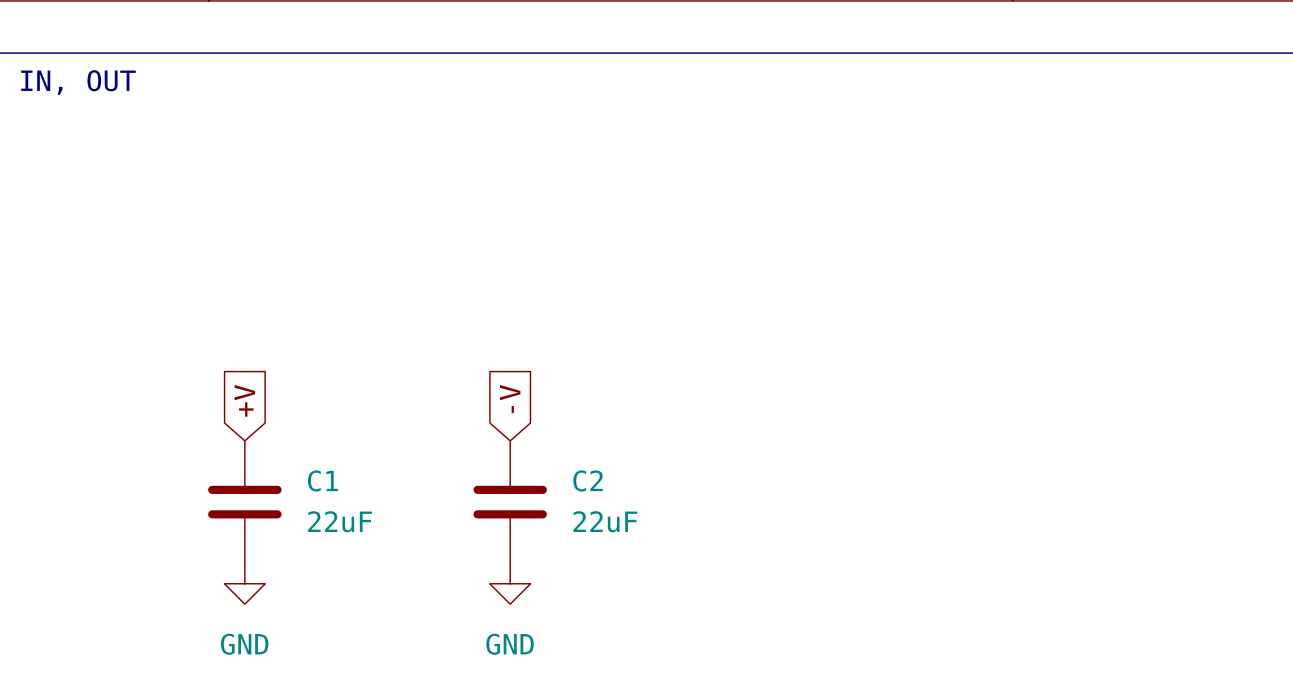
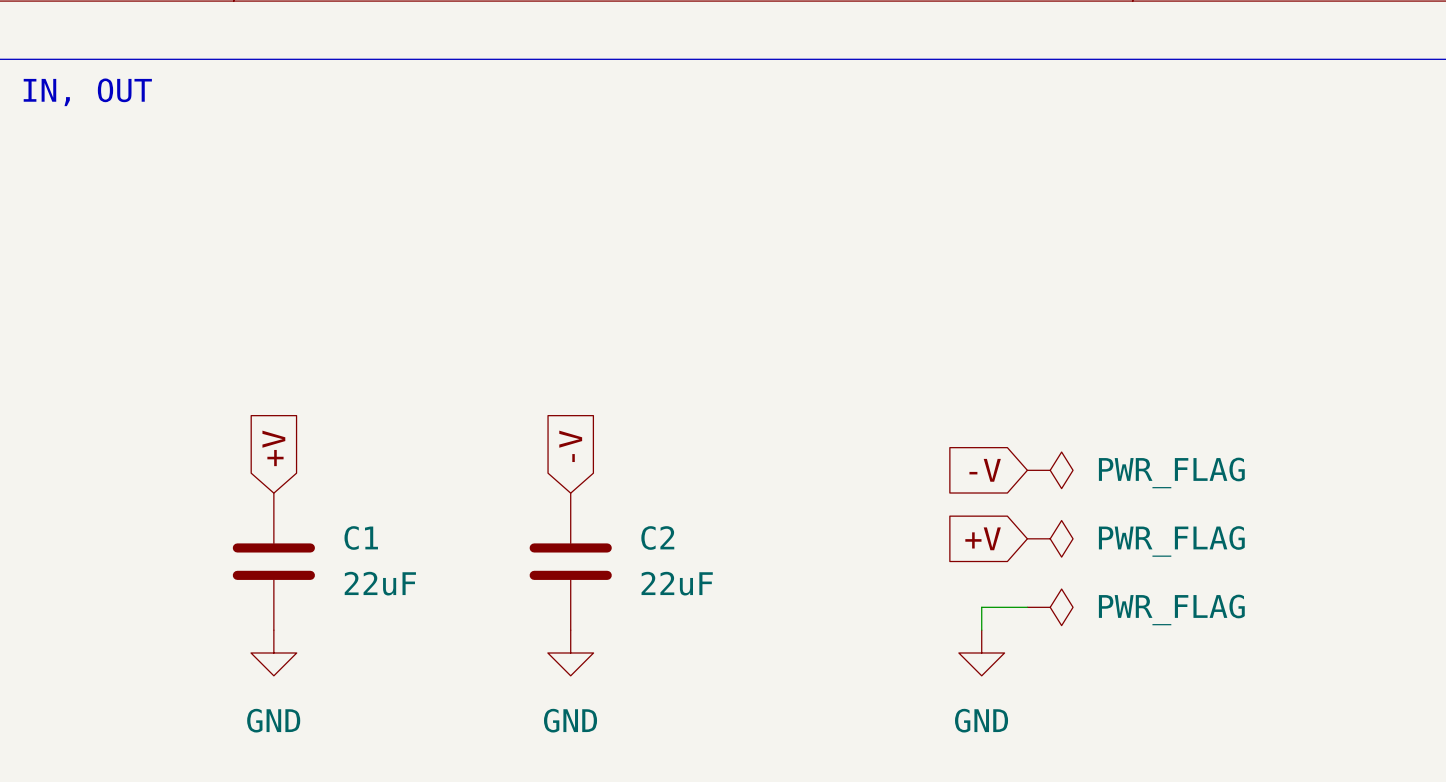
global label: none -> -V (985, 470)
power symbol: none -> PWR_FLAG (1050, 470)
global label: none -> +V (983, 538)
power symbol: none -> PWR_FLAG (1050, 538)
wire: none -> (1027, 607) (981, 607) (981, 630)
power symbol: none -> PWR_FLAG (1050, 607)
power symbol: none -> GND (981, 653)

